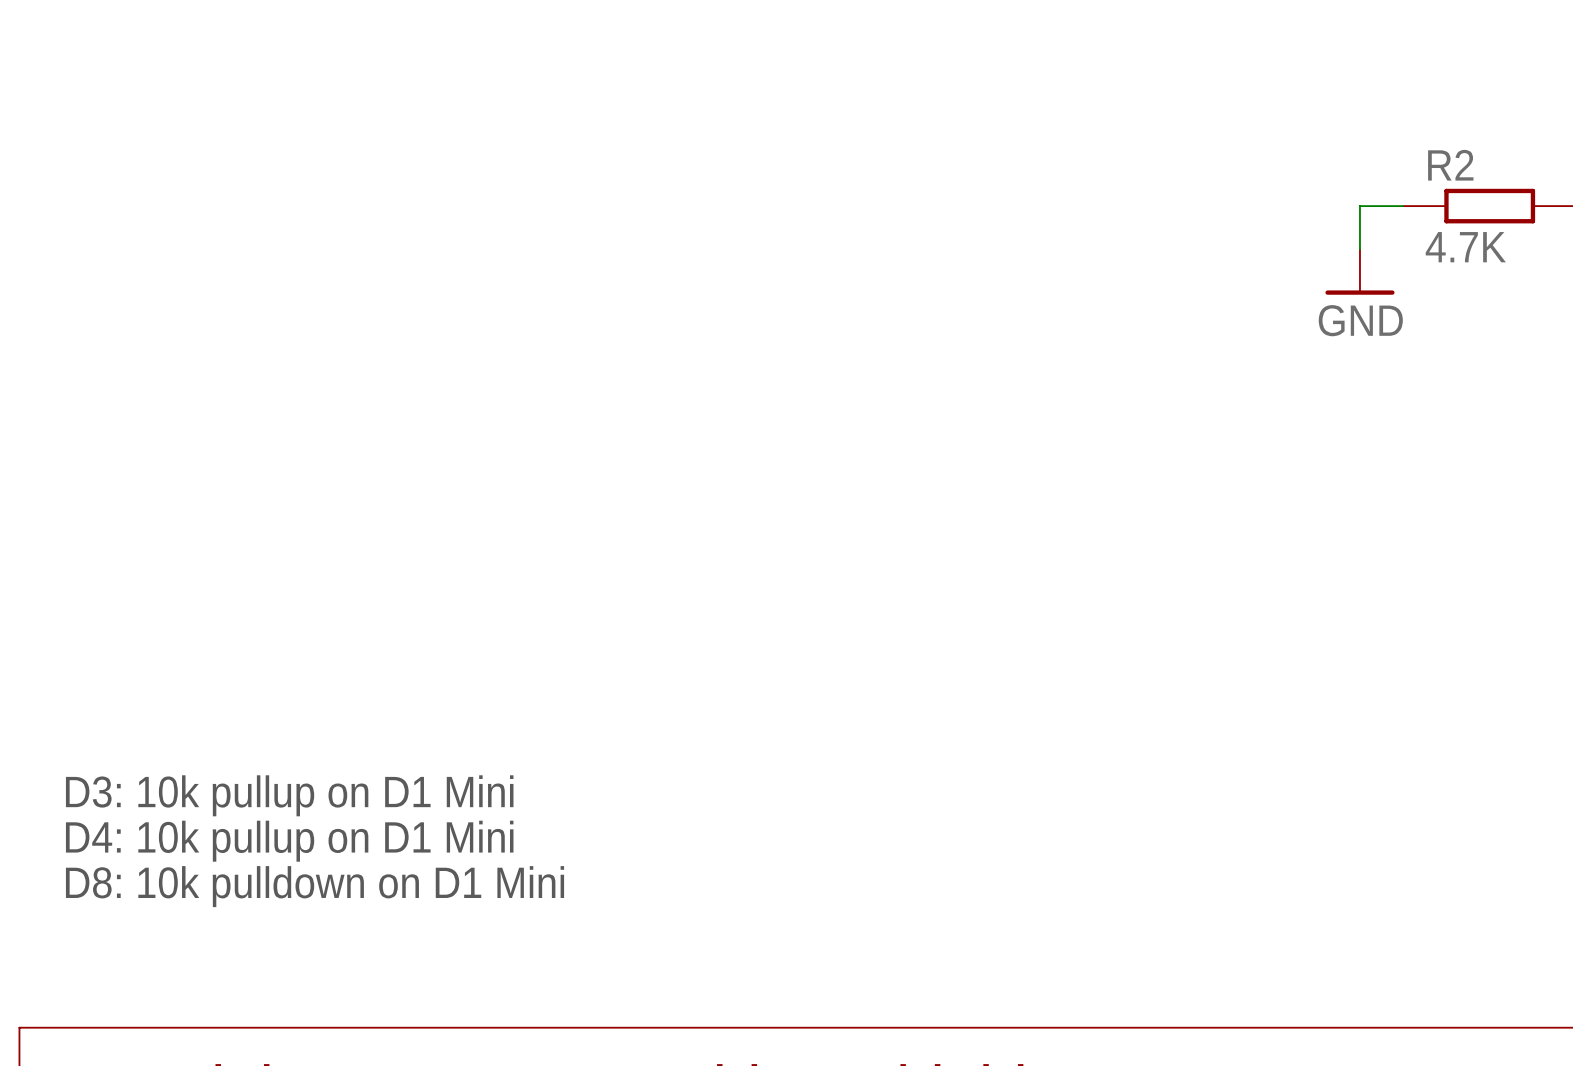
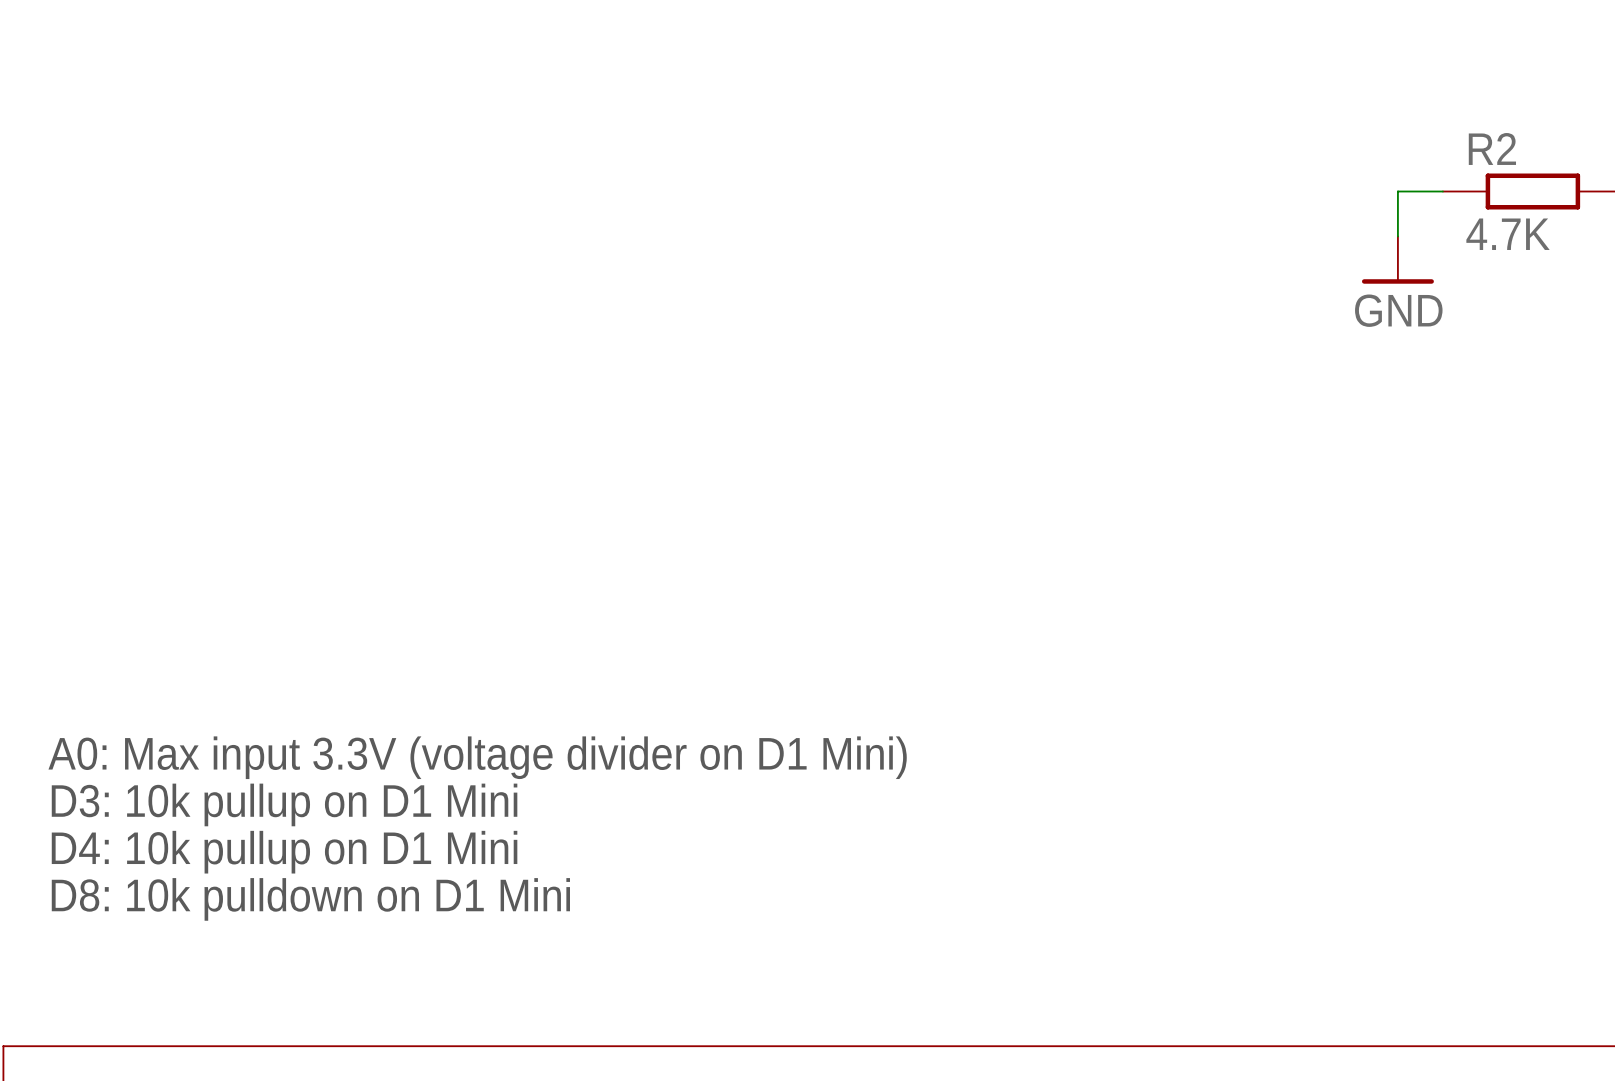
text: none -> A0: Max input 3.3V (voltage divider on D1 Mini) (477, 757)

